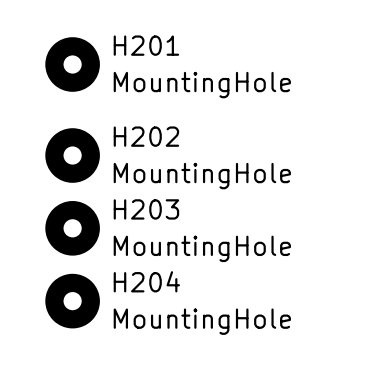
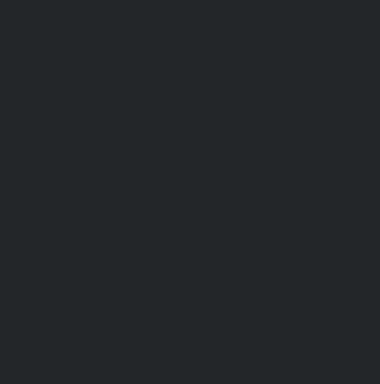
H201: MountingHole (72, 64) -> none
H202: MountingHole (72, 155) -> none
H203: MountingHole (72, 228) -> none
H204: MountingHole (72, 301) -> none

